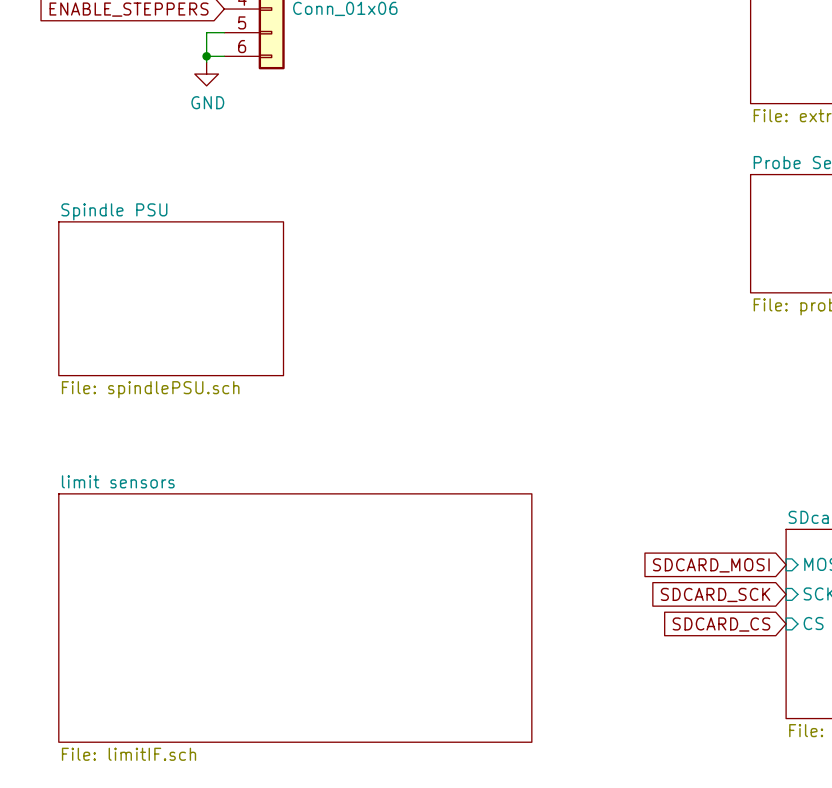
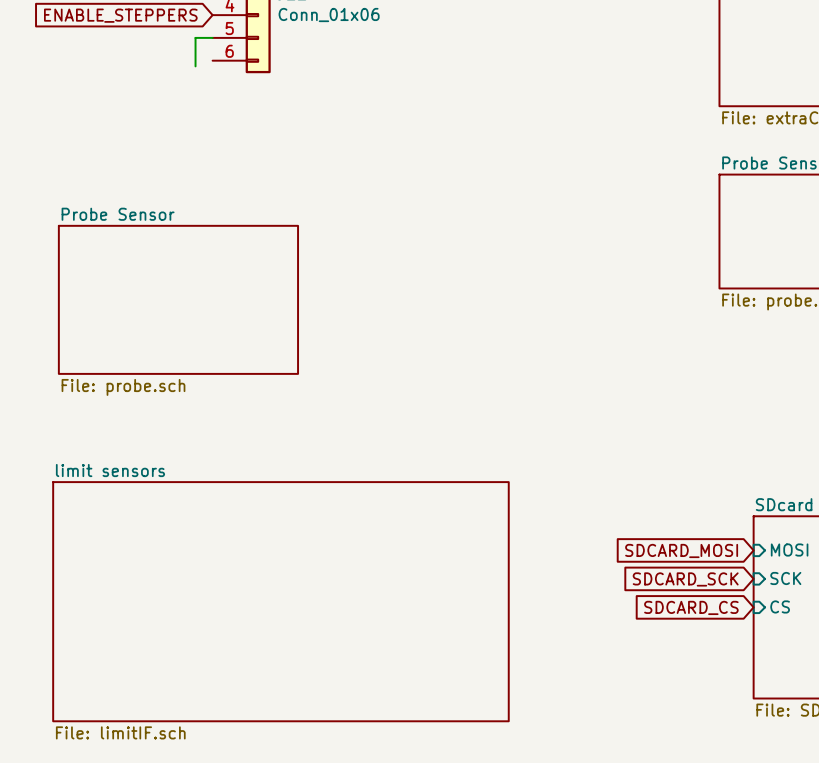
wire: (206, 56) (224, 56) -> none
junction: (206, 56) -> none
power symbol: GND (206, 74) -> none
sheet Spindle PSU: File: spindlePSU.sch (171, 298) -> none
sheet Probe Sensor: none -> File: probe.sch (178, 299)

